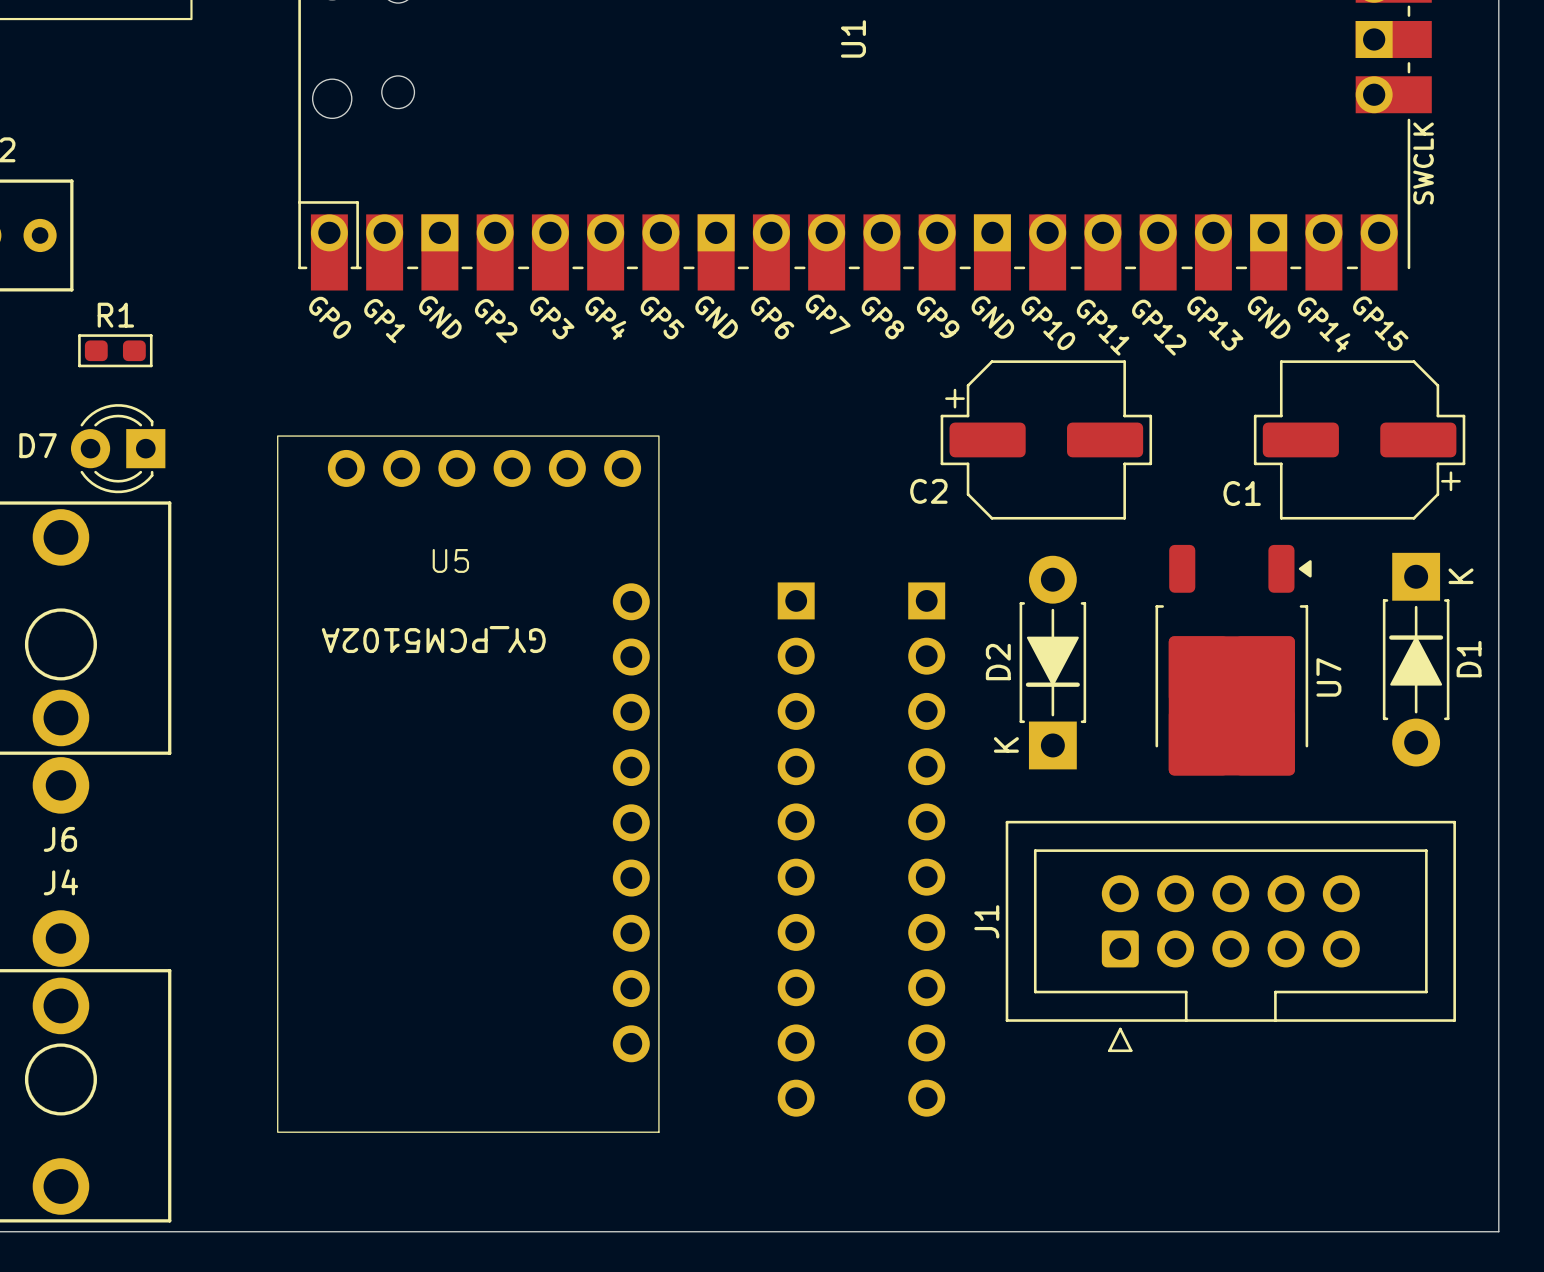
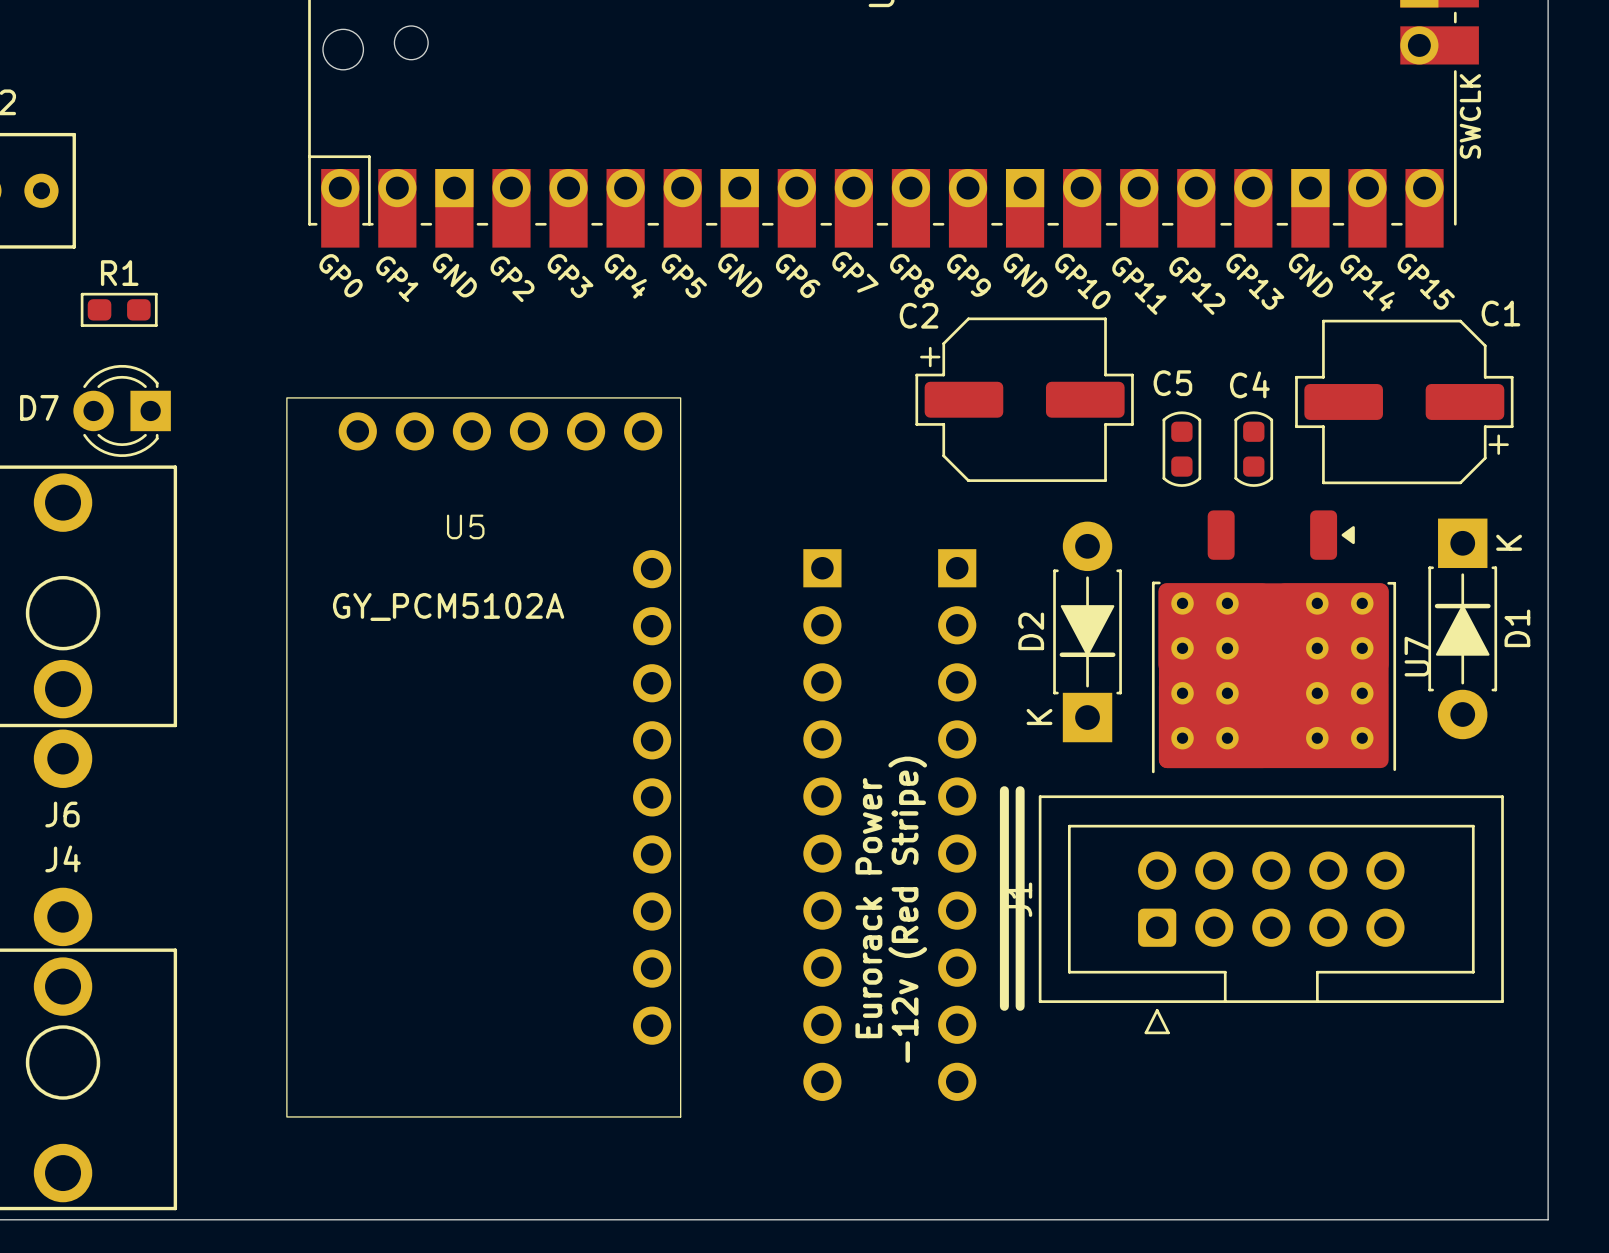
C2 position: (1046, 439) -> (1024, 399)
C5: none -> (1181, 449)
C4: none -> (1253, 449)
C2 name position: C2 (928, 491) -> C2 (919, 315)
C1 name position: C1 (1242, 493) -> C1 (1500, 313)
U7 footprint: [1155, 544, 1312, 776] -> [1151, 510, 1397, 774]
U5 text rotation: 0° (433, 639) -> 180° (448, 606)
U7 name position: U7 (1328, 677) -> U7 (1417, 656)
line: none -> (1004, 790) (1004, 1006)
line: none -> (1020, 790) (1020, 1006)
text: none -> Eurorack Power (868, 908)
text: none -> -12v (Red Stripe) (907, 909)

